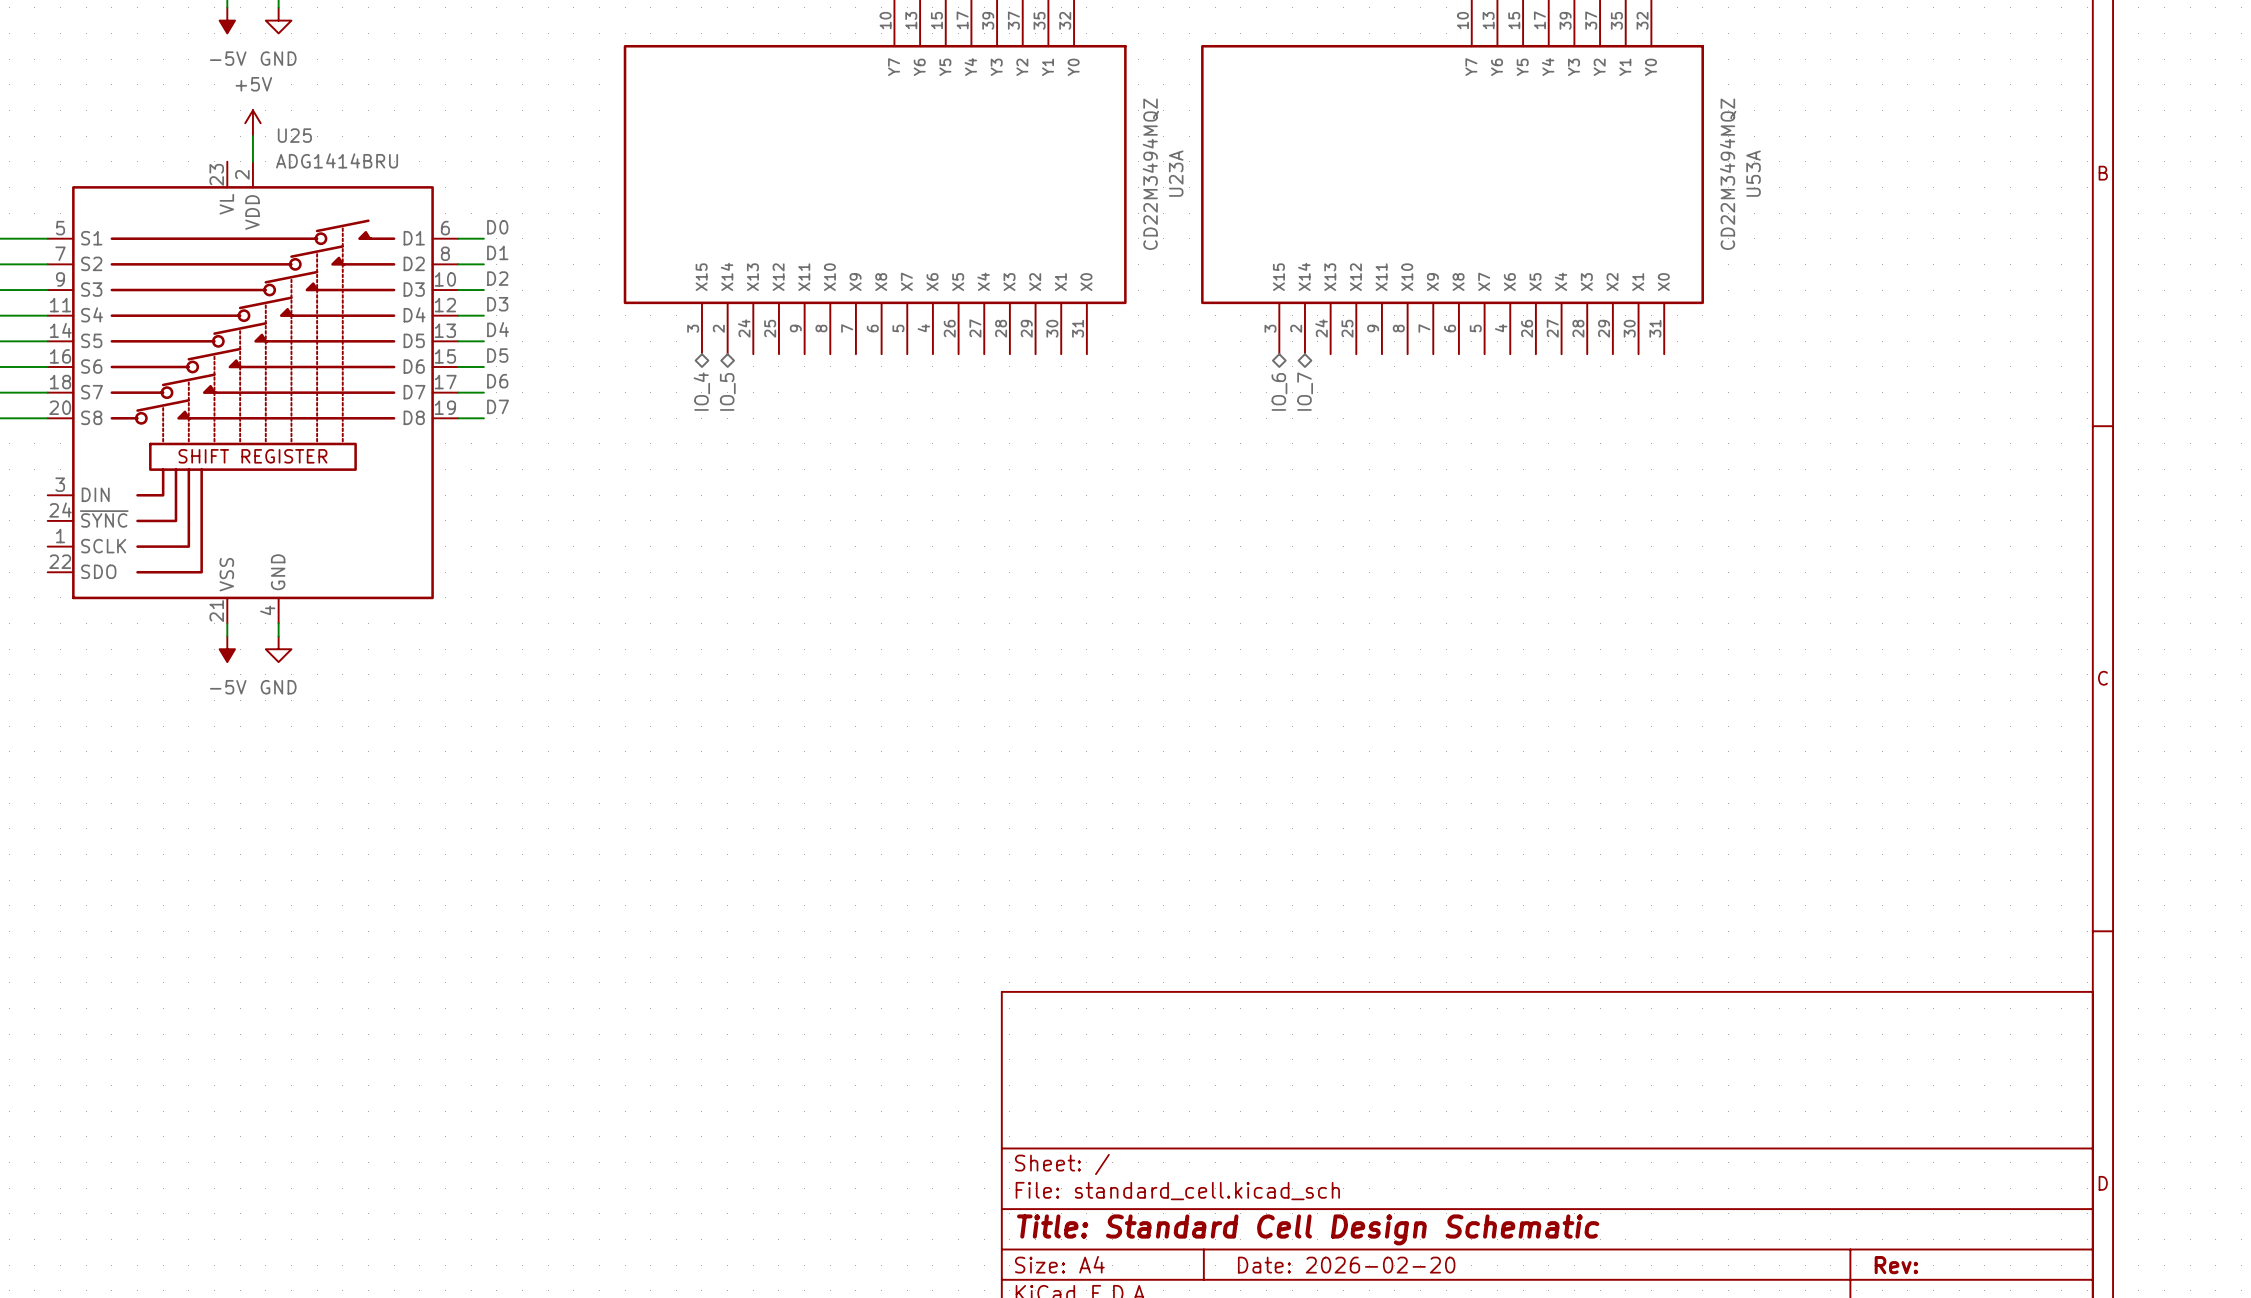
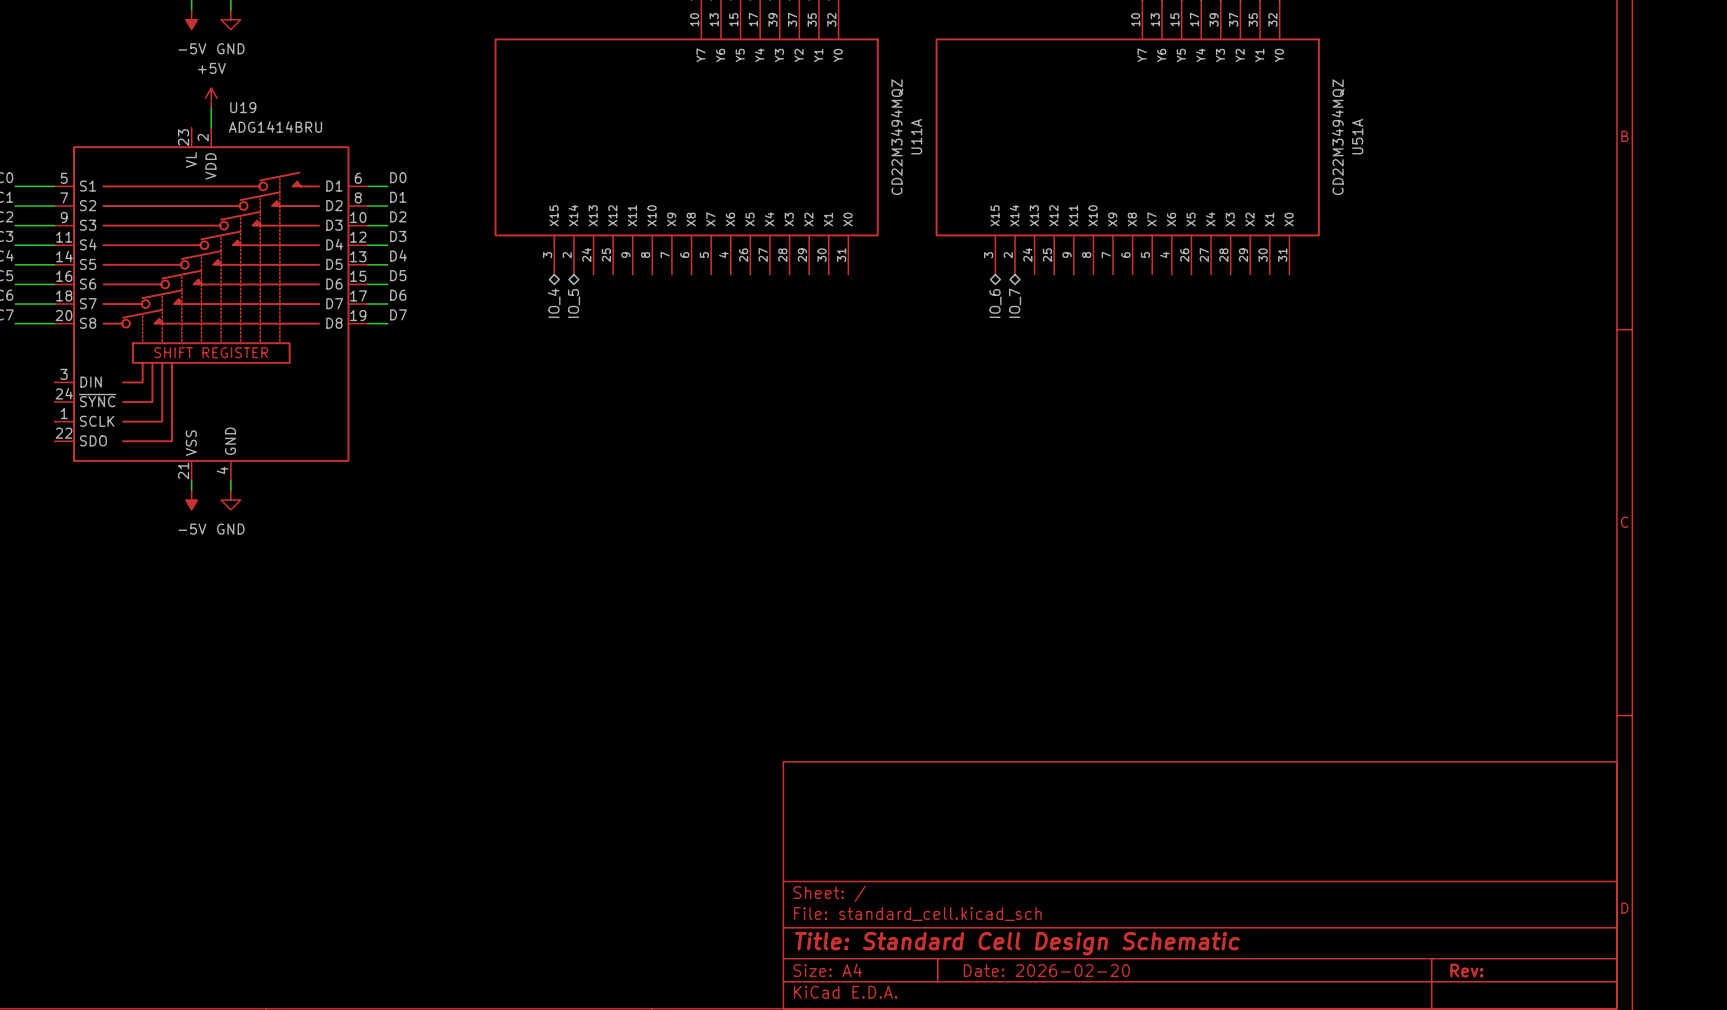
U25 name: U25 (294, 135) -> U19 (243, 107)
U23A name: U23A (1176, 173) -> U11A (916, 136)
U53A name: U53A (1753, 173) -> U51A (1357, 136)

